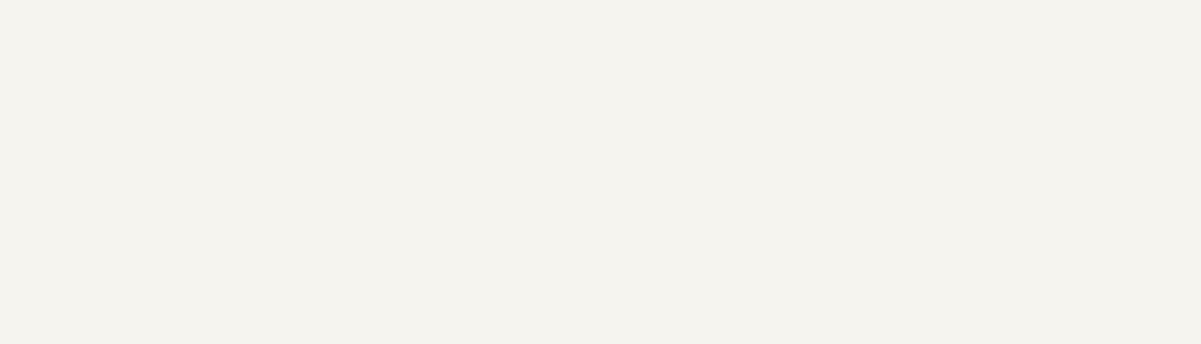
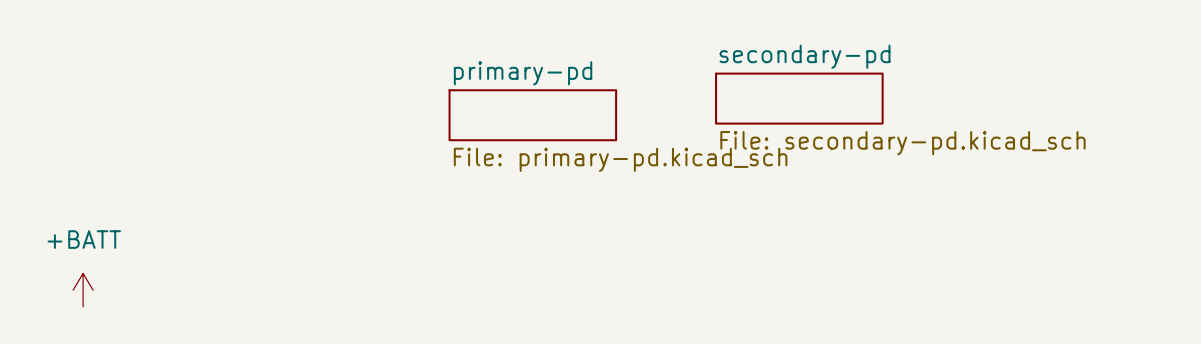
sheet secondary-pd: none -> File: secondary-pd.kicad_sch (799, 98)
sheet primary-pd: none -> File: primary-pd.kicad_sch (532, 115)
power symbol: none -> +BATT (83, 290)

